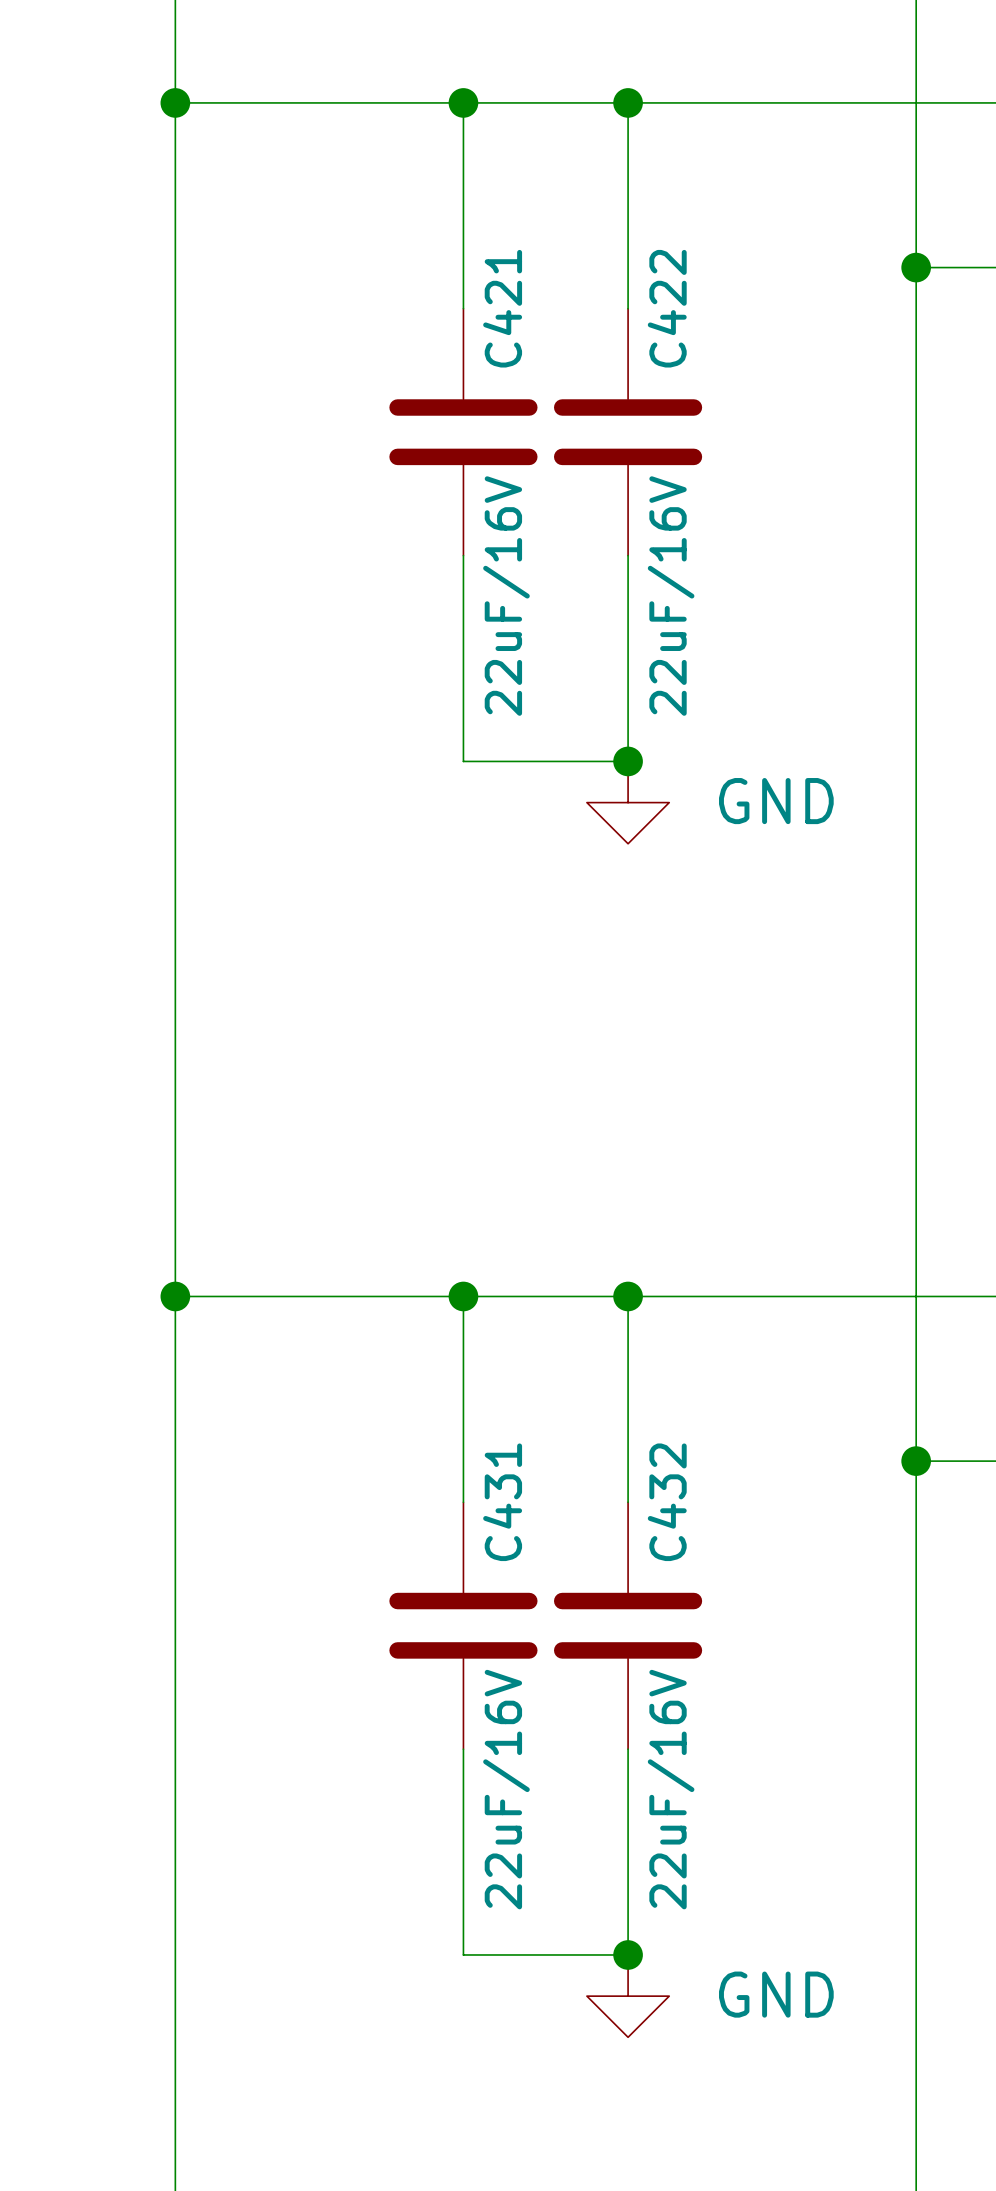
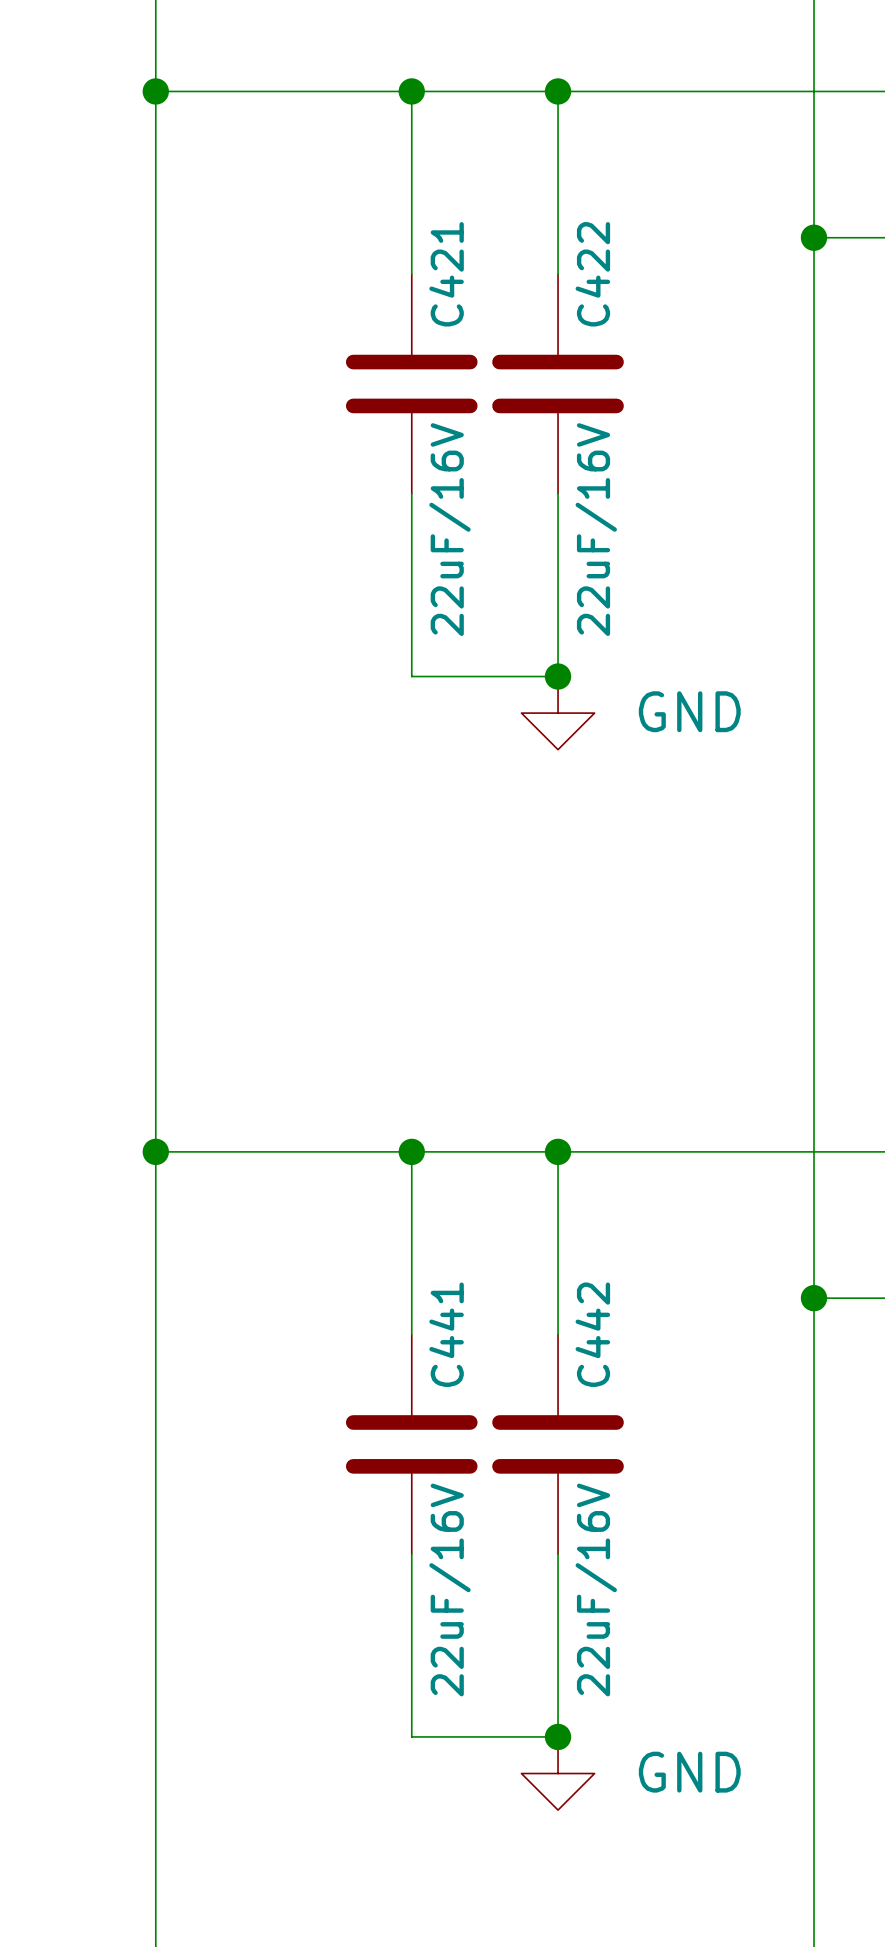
C431 name: C431 (502, 1502) -> C441 (446, 1334)
C432 name: C432 (667, 1502) -> C442 (592, 1334)

